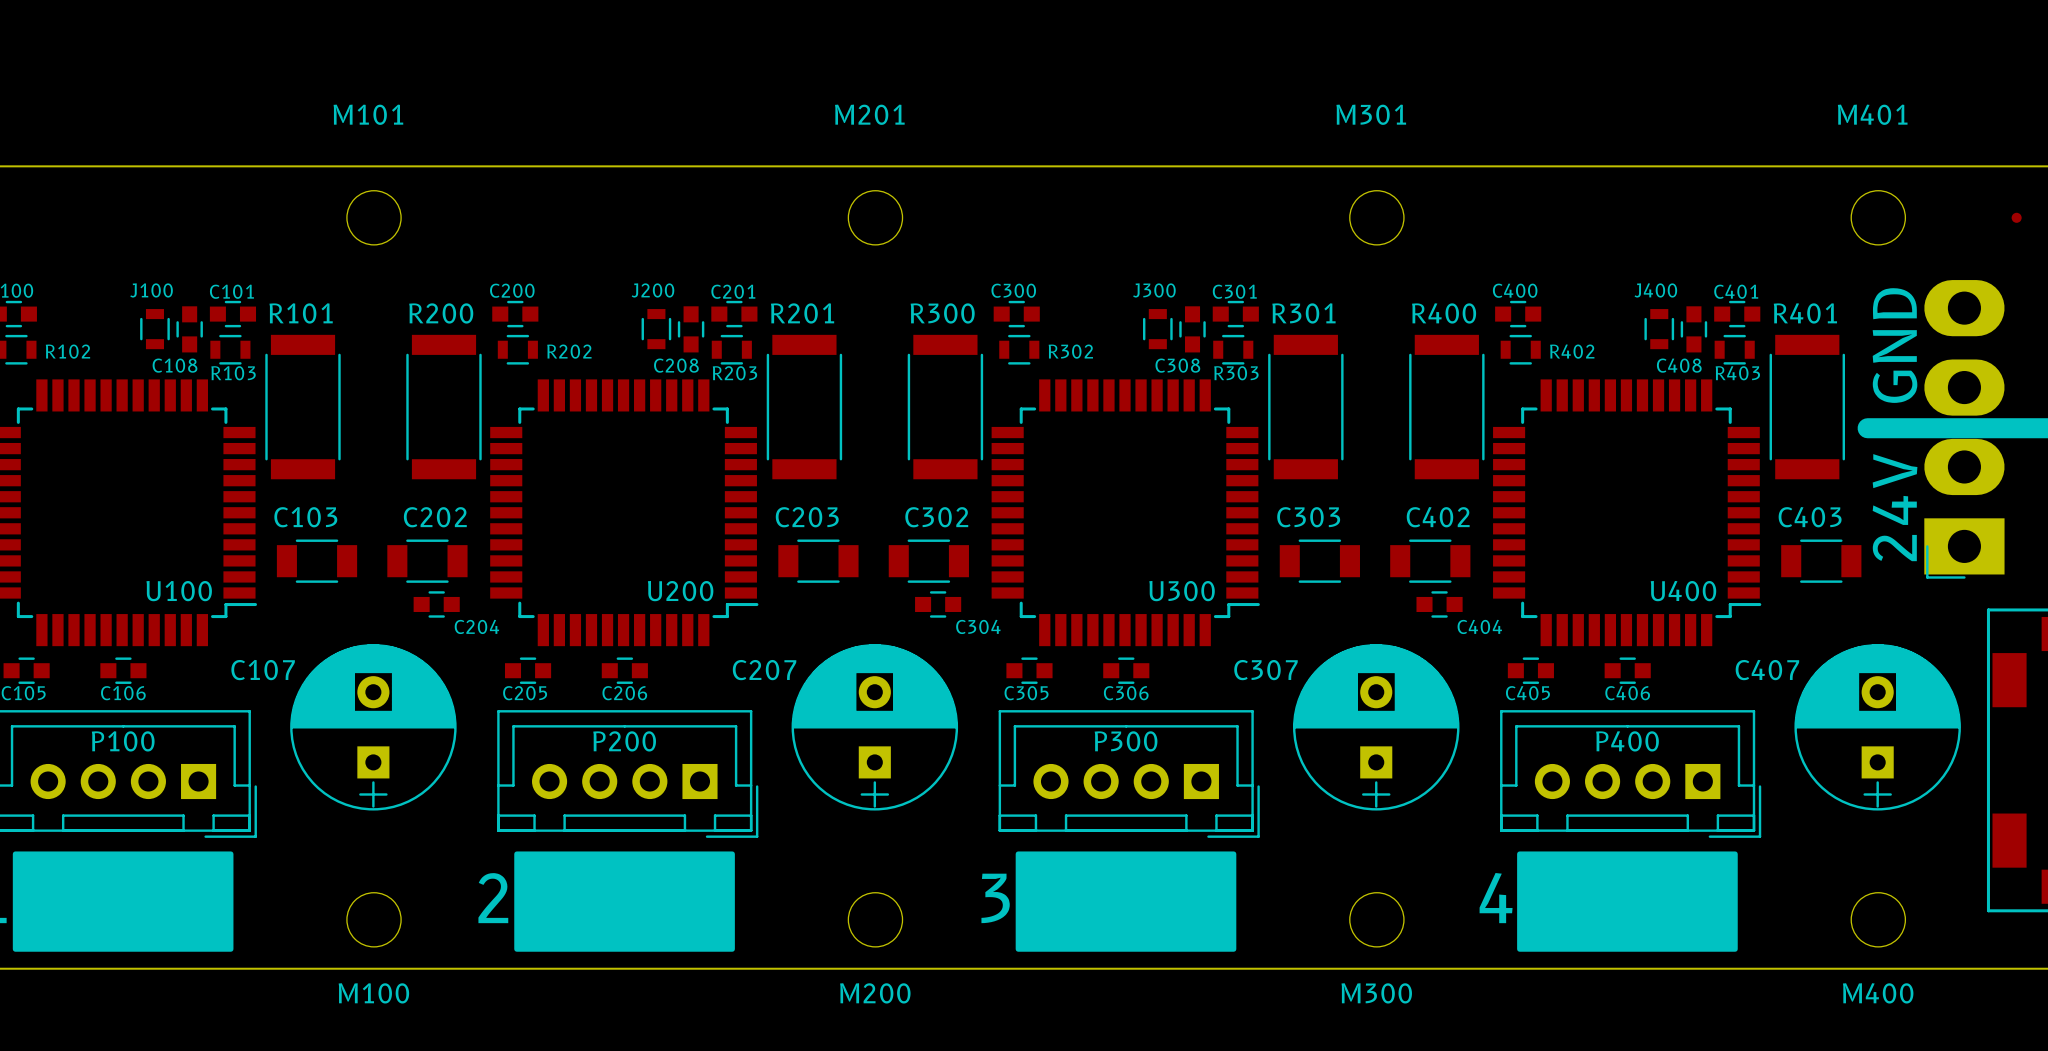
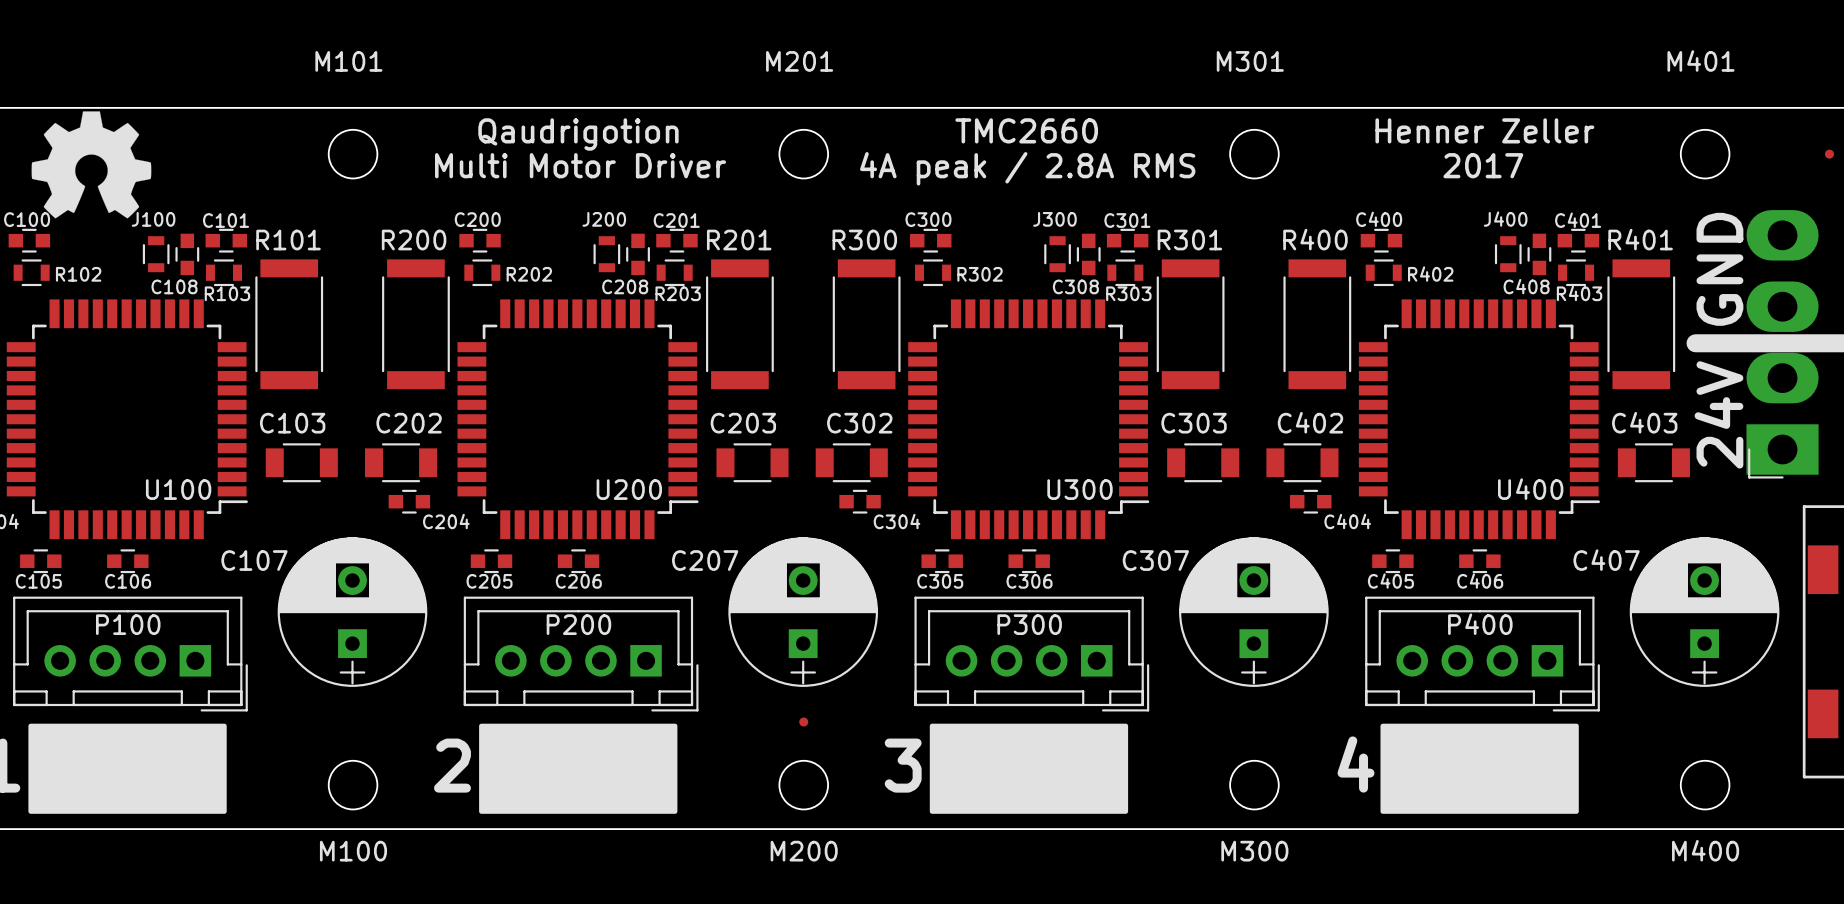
drawing: none -> [31, 111, 152, 219]
text: none -> Henner Zeller (1484, 130)
text: none -> TMC2660 (1026, 130)
text: none -> Qaudrigotion (578, 134)
text: none -> Multi Motor Driver (580, 165)
text: none -> 2017 (1483, 165)
text: none -> 4A peak / 2.8A RMS (1027, 168)
part: none -> (803, 722)

